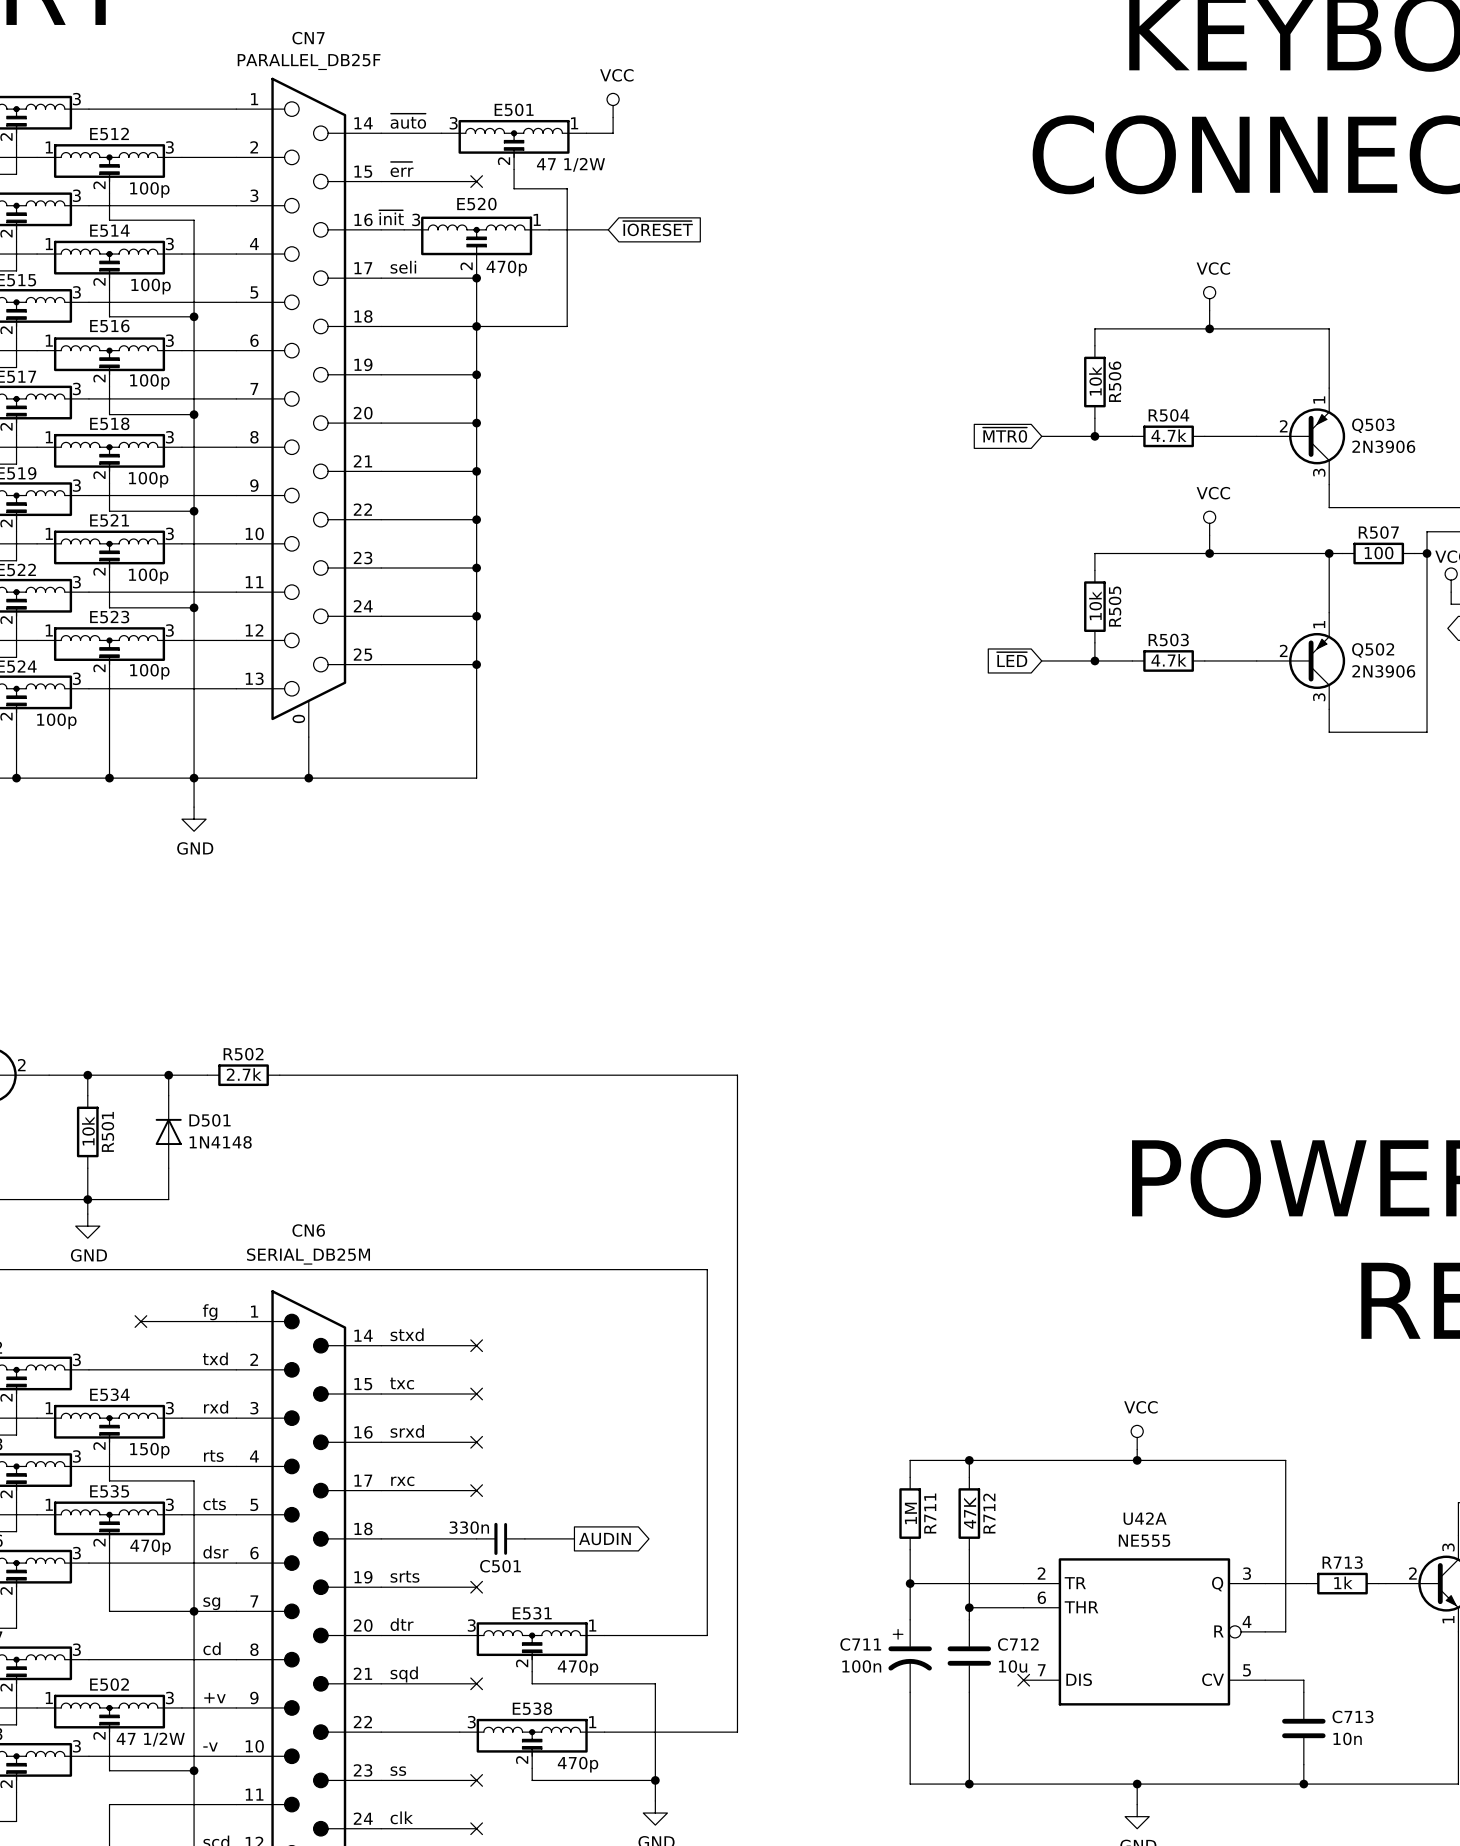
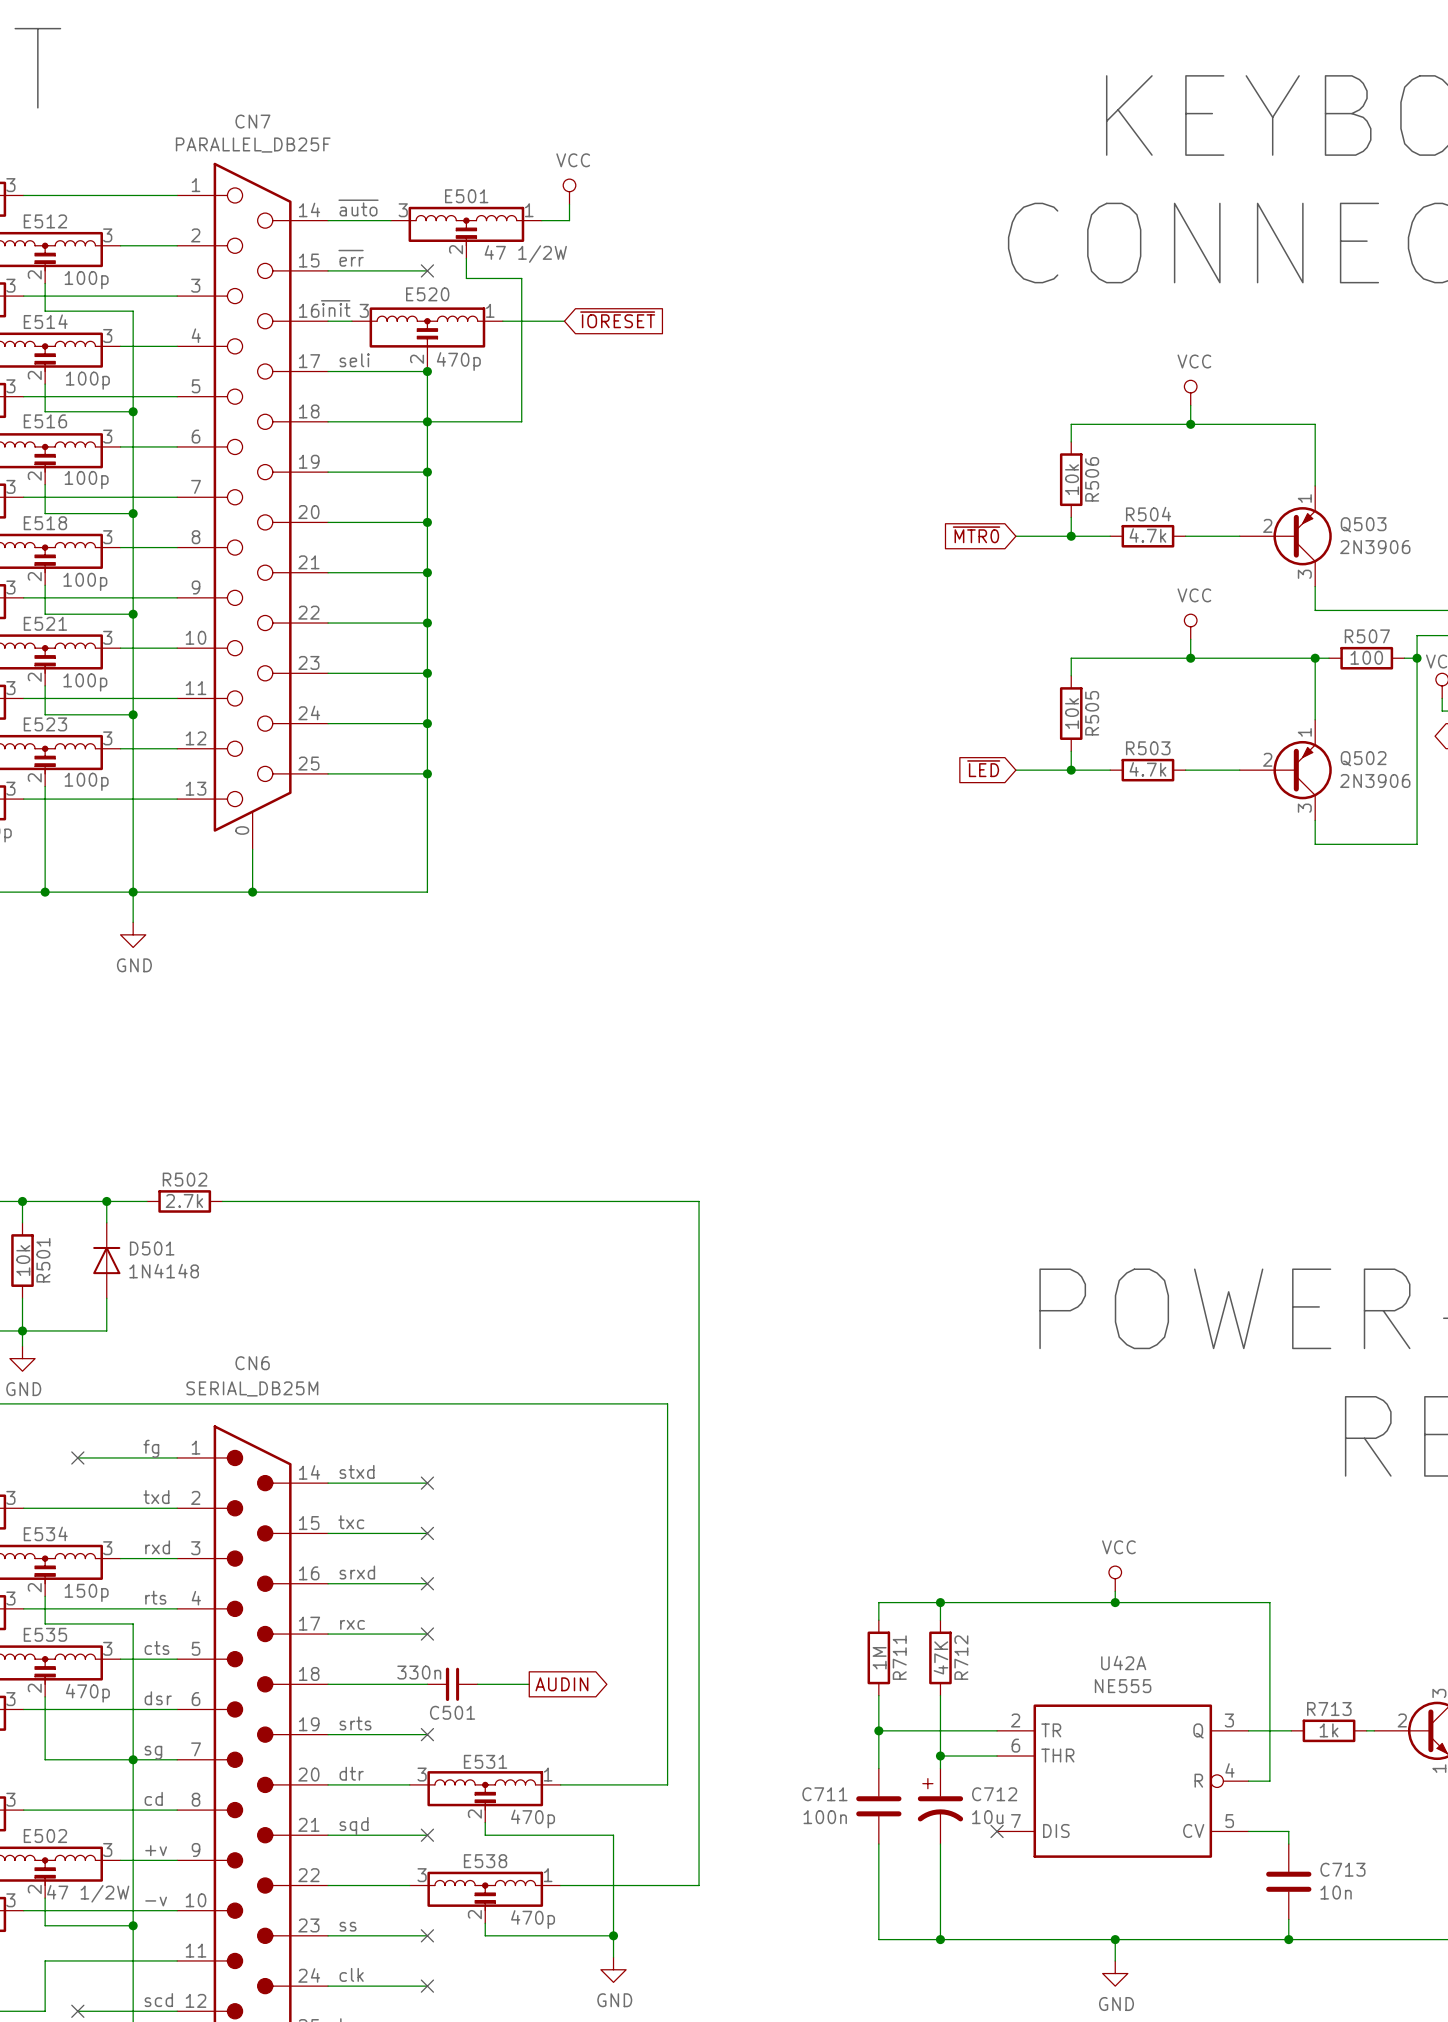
C711 symbol: [888, 1619, 932, 1693] -> [856, 1768, 902, 1845]
C712 symbol: [947, 1619, 992, 1693] -> [917, 1768, 964, 1845]

